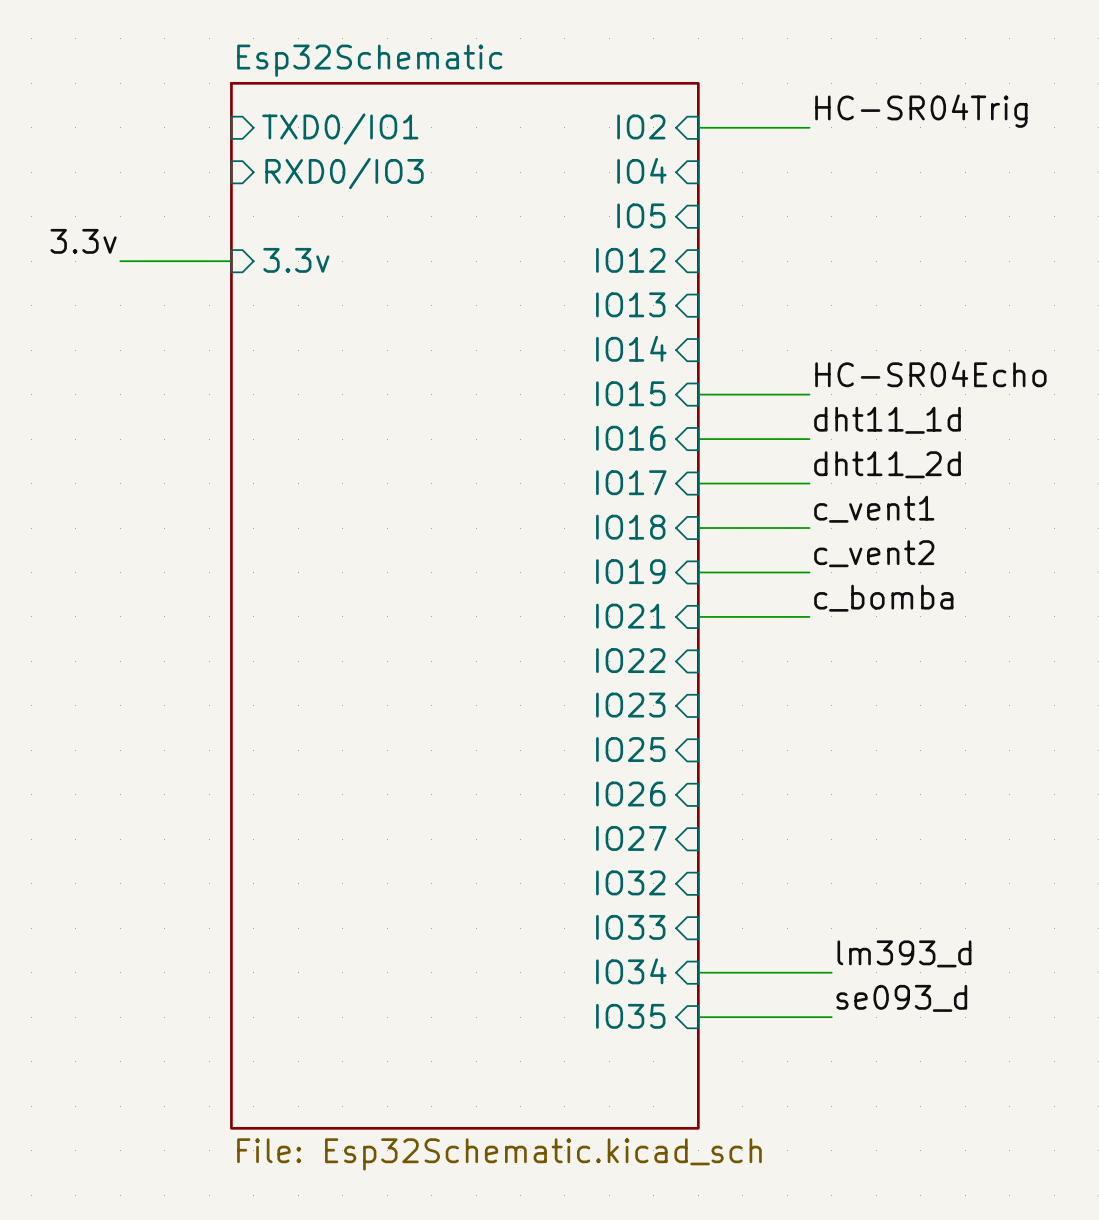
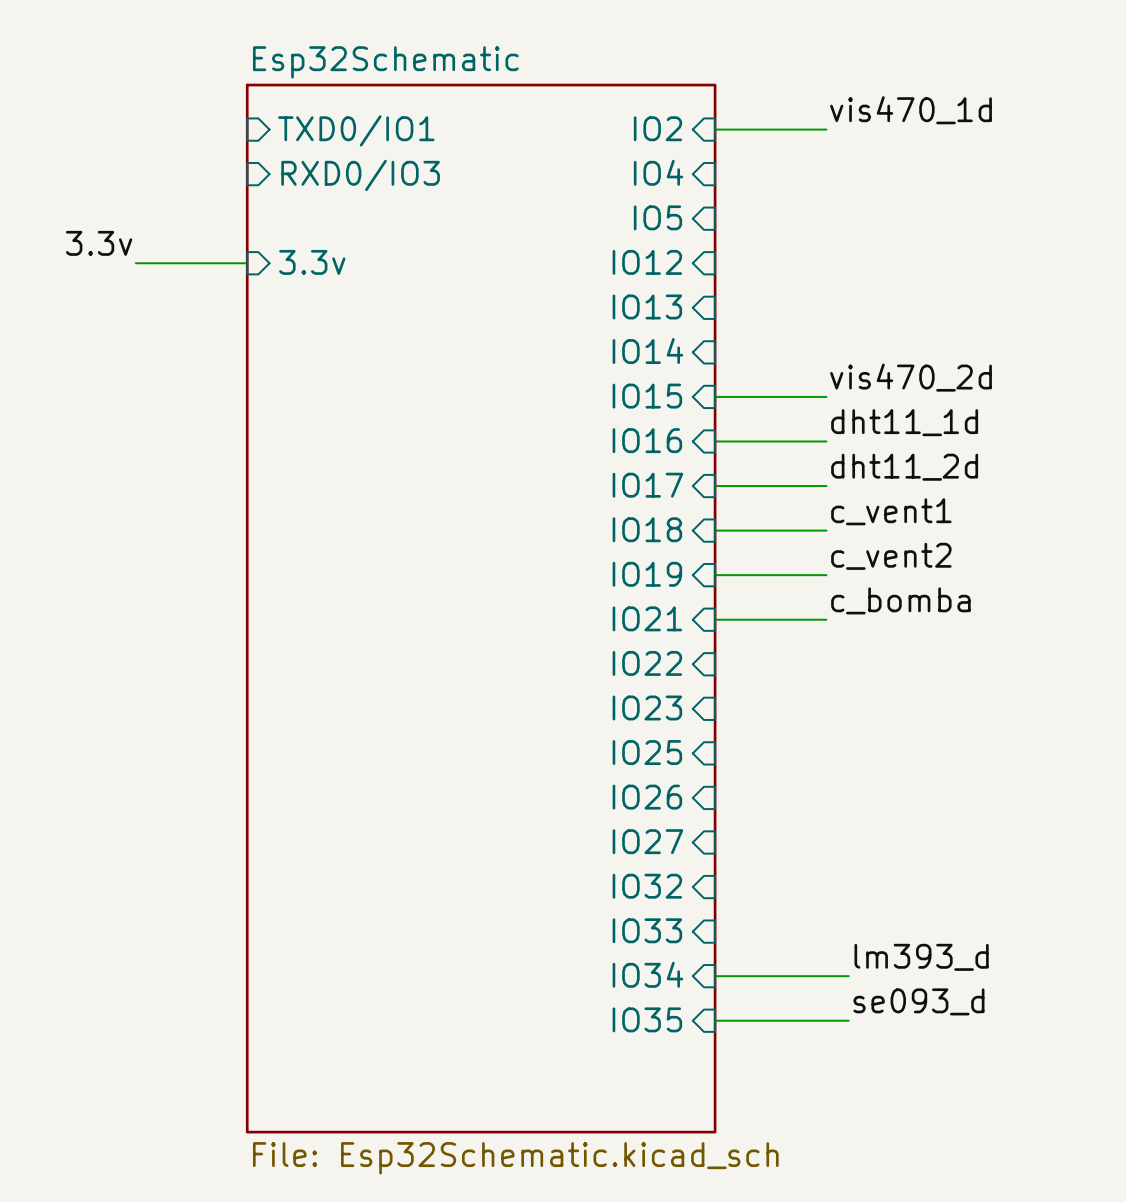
label: HC-SR04Trig (921, 111) -> vis470_1d (910, 110)
label: HC-SR04Echo (930, 374) -> vis470_2d (910, 377)

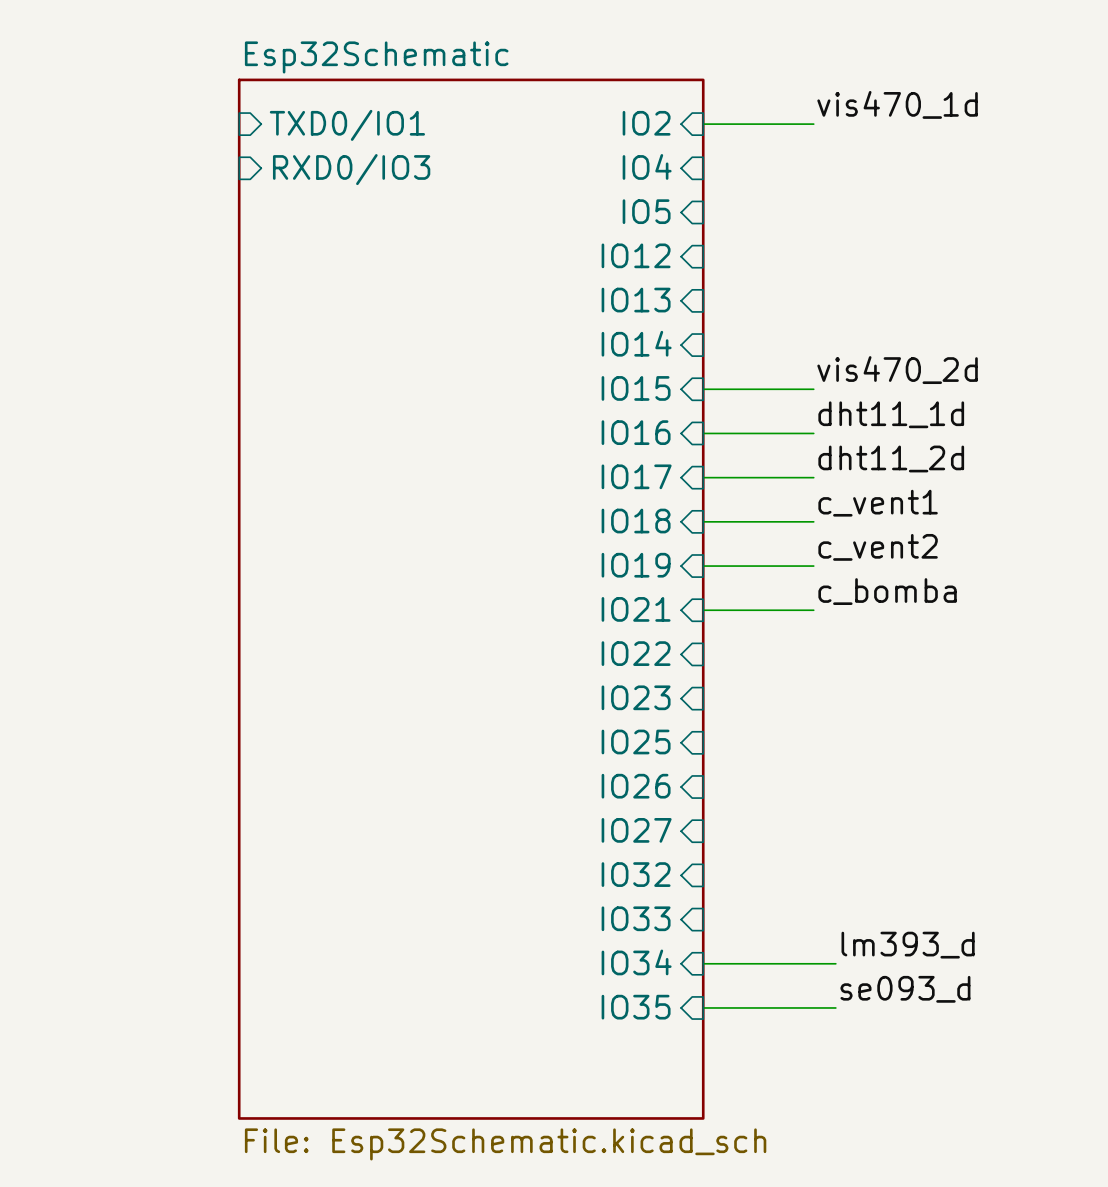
label: 3.3v (99, 243) -> none
sheet pin: 3.3v (312, 262) -> none
wire: (135, 263) (247, 263) -> none

